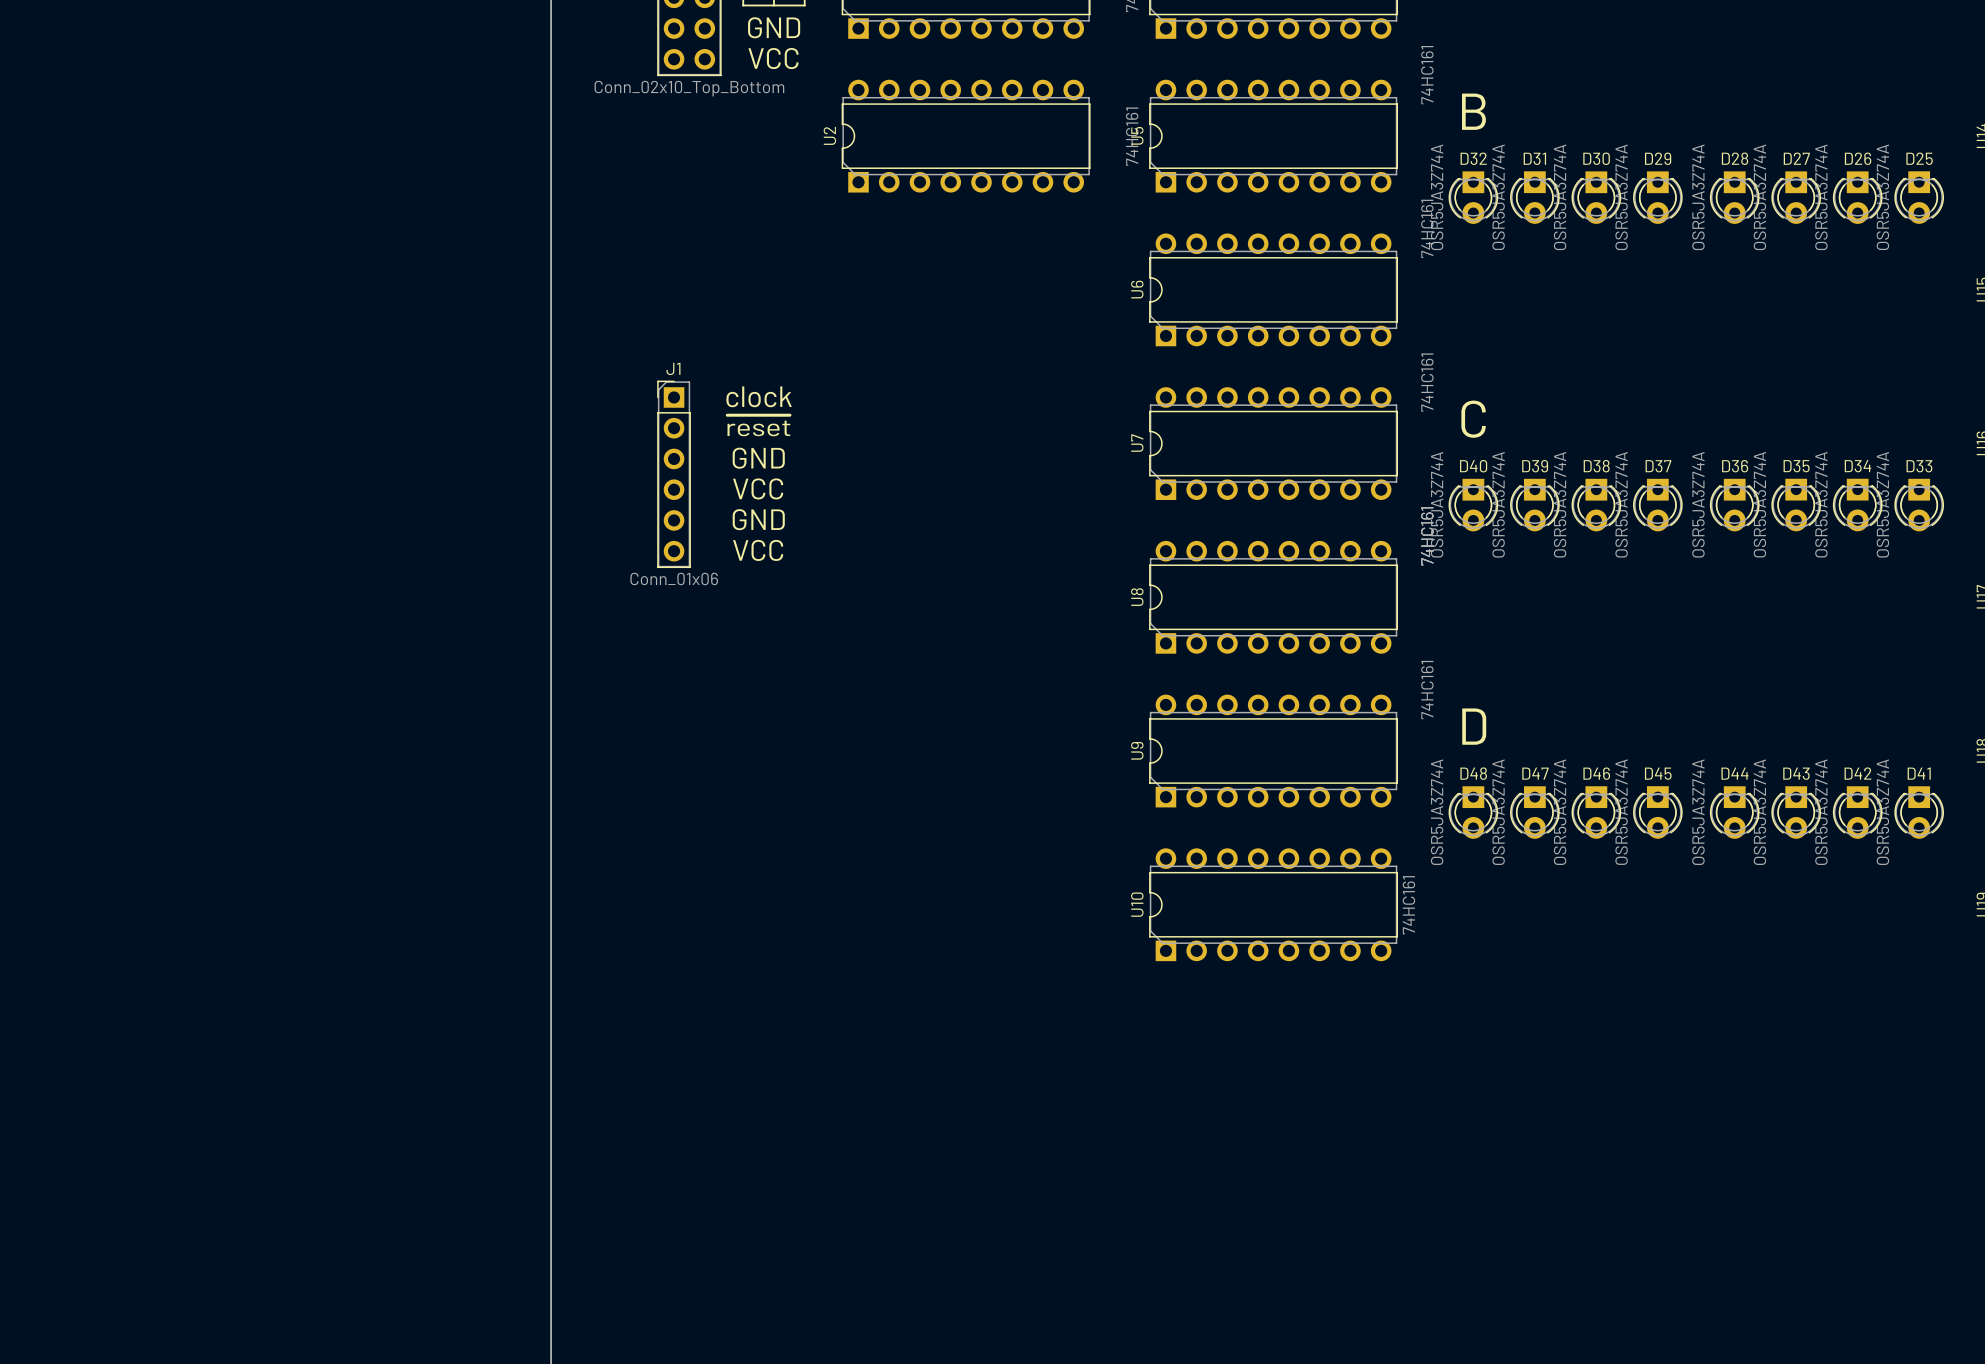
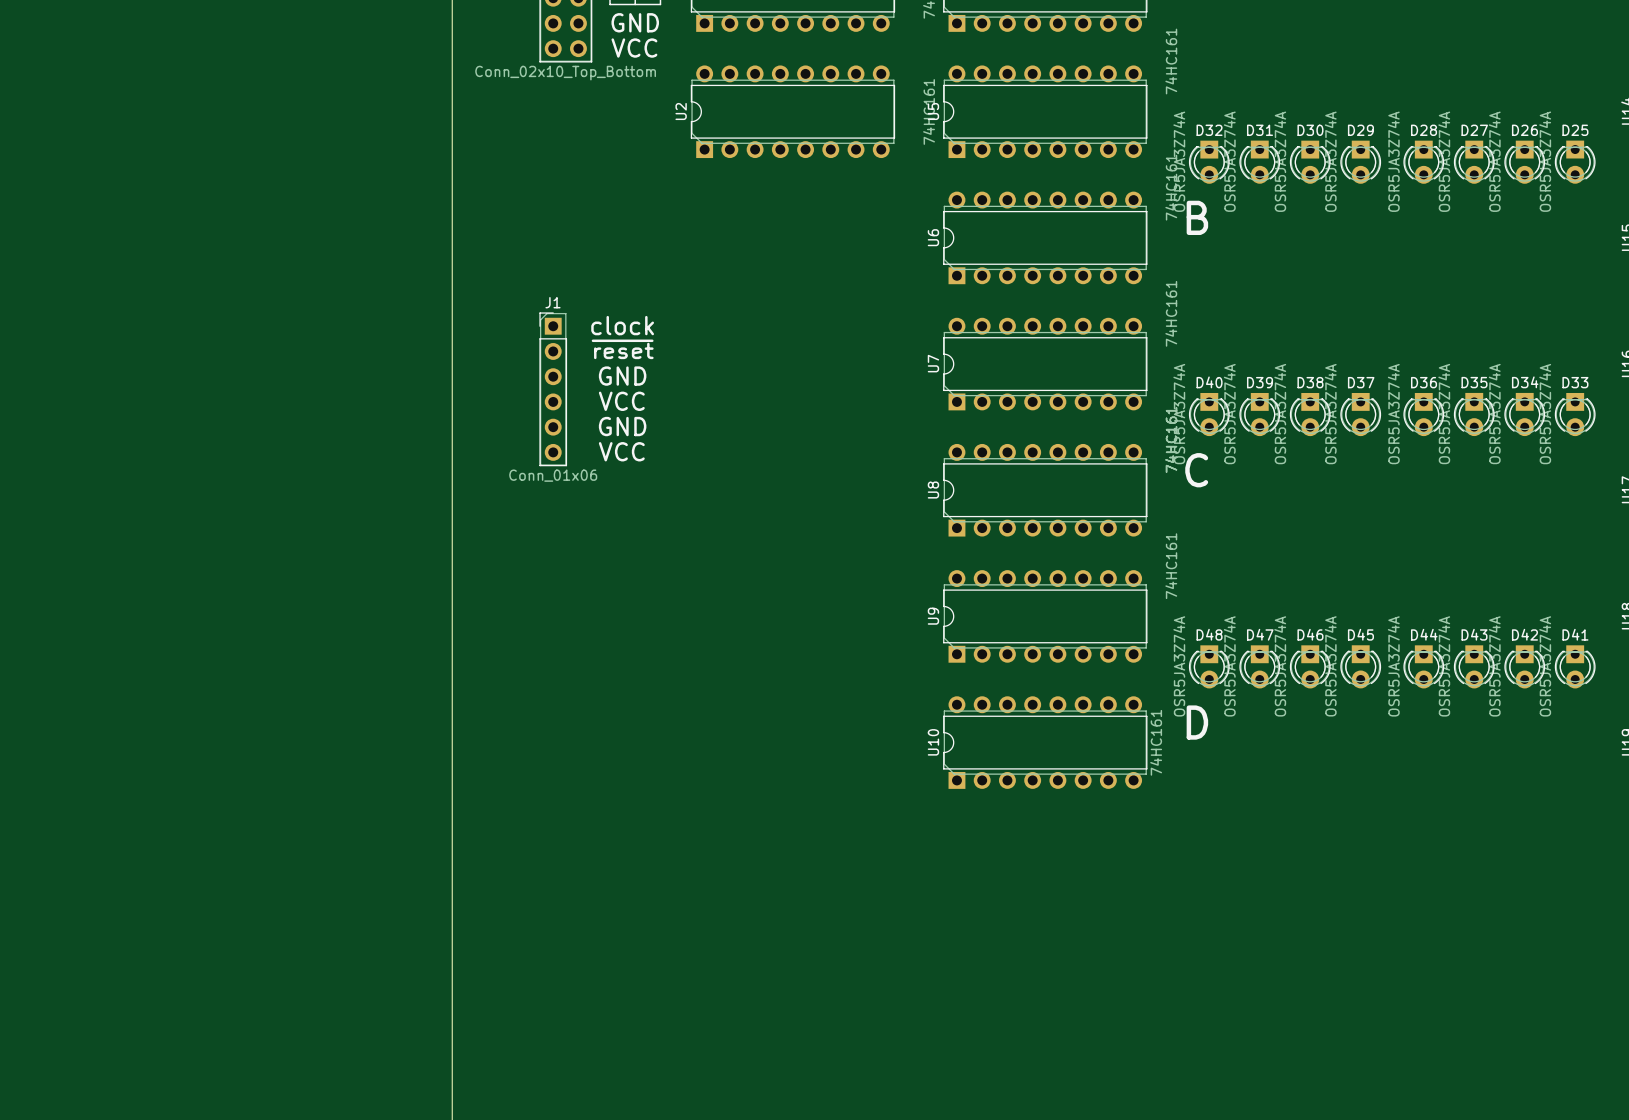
text position: B (1473, 111) -> B (1197, 217)
text position: C (1473, 419) -> C (1196, 470)
text position: D (1474, 726) -> D (1197, 722)

